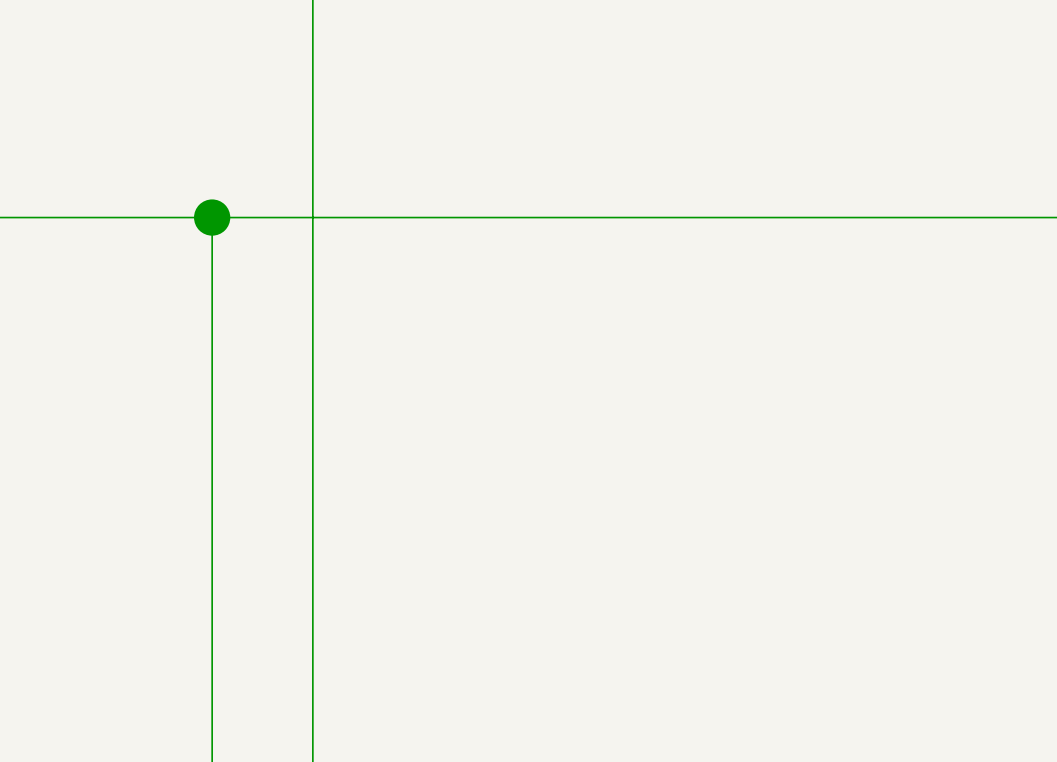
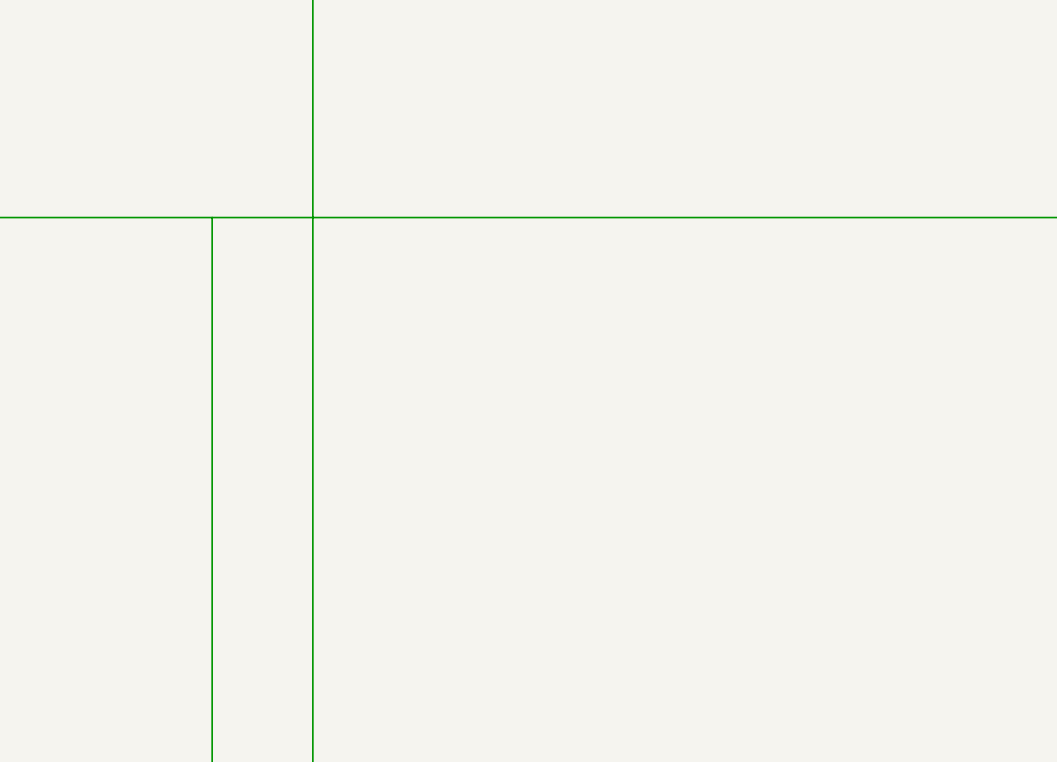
junction: (212, 217) -> none

